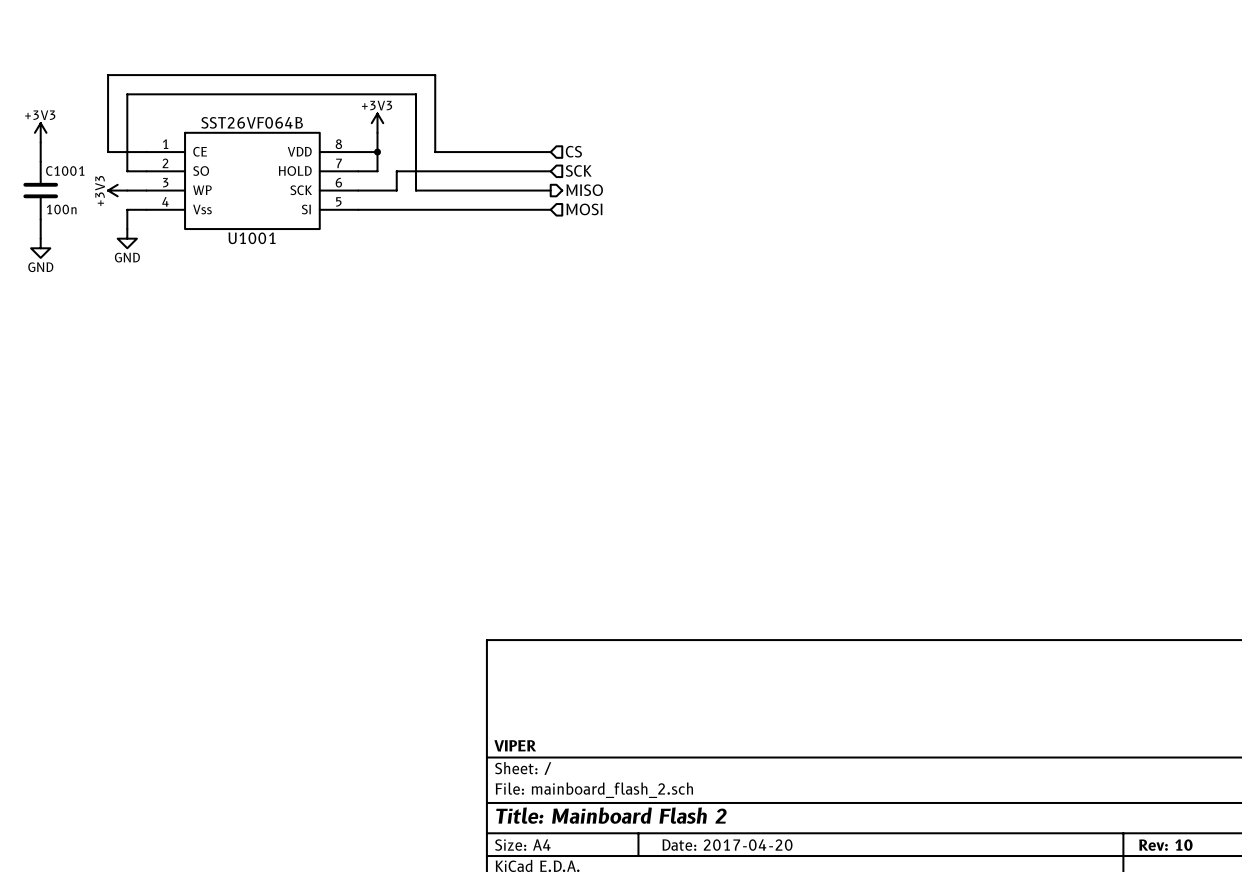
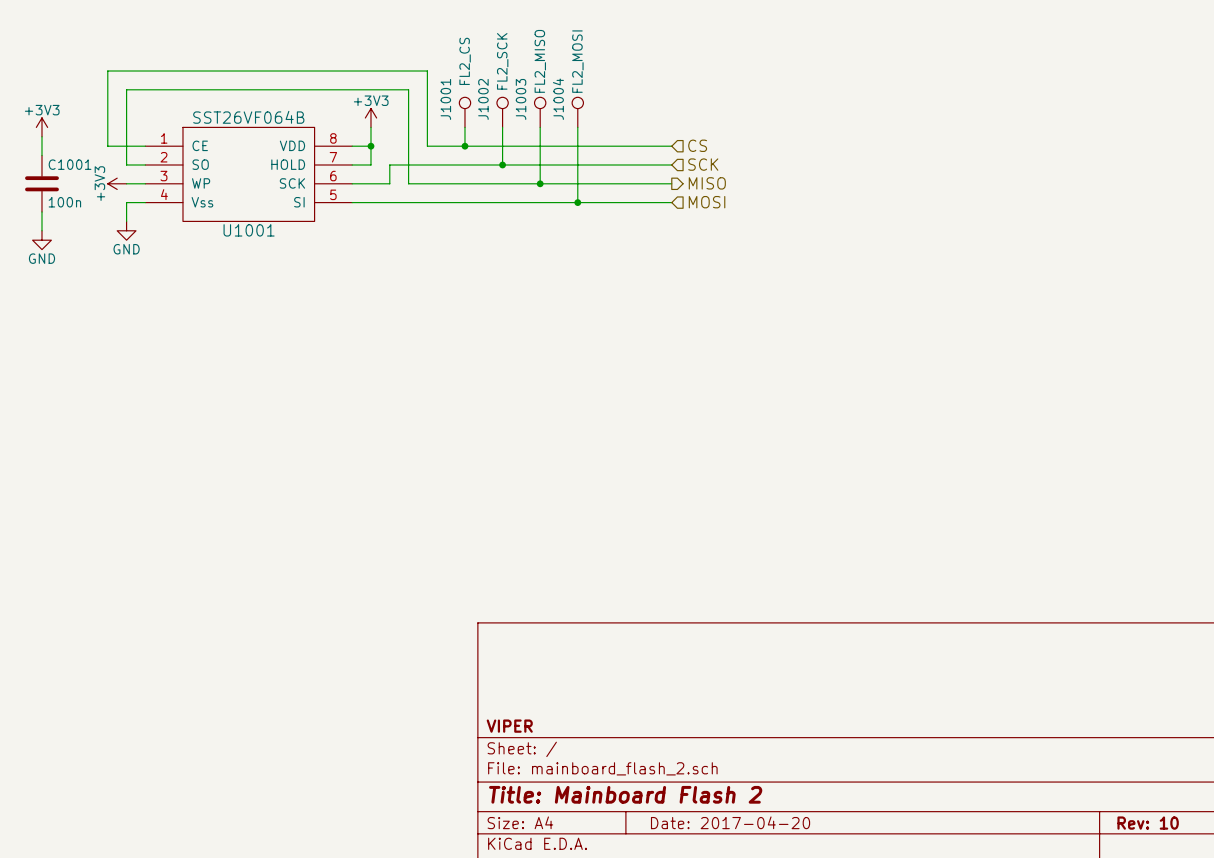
J1001: none -> FL2_CS (464, 112)
J1002: none -> FL2_SCK (502, 112)
J1003: none -> FL2_MISO (540, 112)
J1004: none -> FL2_MOSI (577, 112)
wire: none -> (464, 127) (464, 146)
wire: none -> (502, 127) (502, 165)
wire: none -> (540, 127) (540, 183) (671, 183)
wire: none -> (577, 127) (577, 202)
hierarchical label position: CS (573, 151) -> CS (697, 145)
junction: none -> (464, 146)
wire: none -> (540, 146) (671, 146)
hierarchical label position: SCK (578, 170) -> SCK (703, 164)
junction: none -> (502, 165)
wire: none -> (540, 165) (671, 165)
junction: none -> (540, 183)
hierarchical label position: MISO (584, 190) -> MISO (707, 183)
wire: none -> (540, 202) (671, 202)
hierarchical label position: MOSI (584, 209) -> MOSI (707, 202)
junction: none -> (577, 202)

